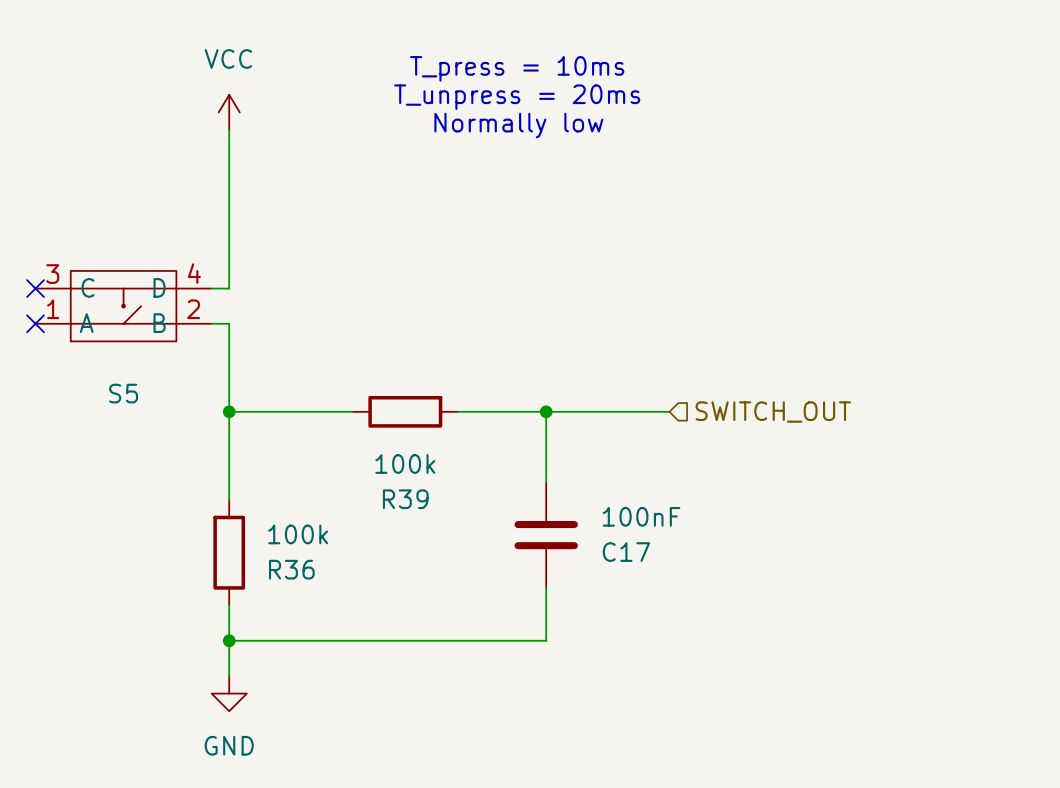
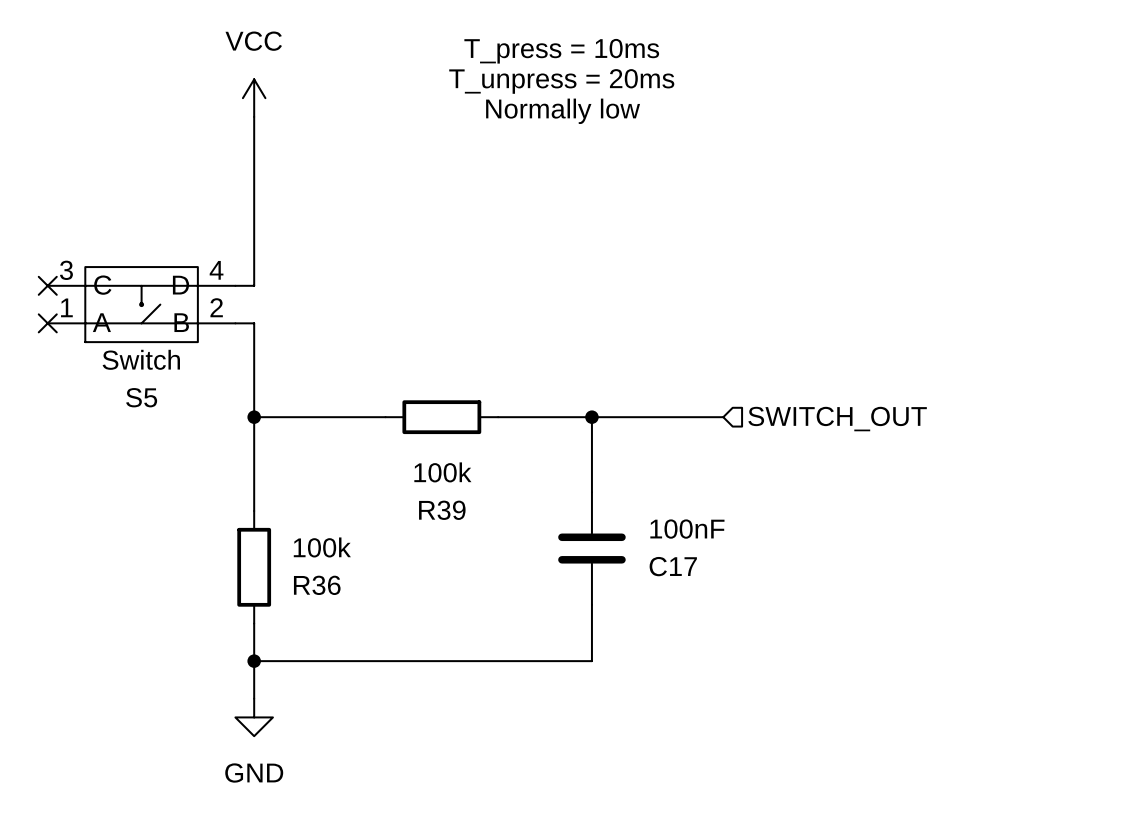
S5 value: none -> Switch (141, 359)

